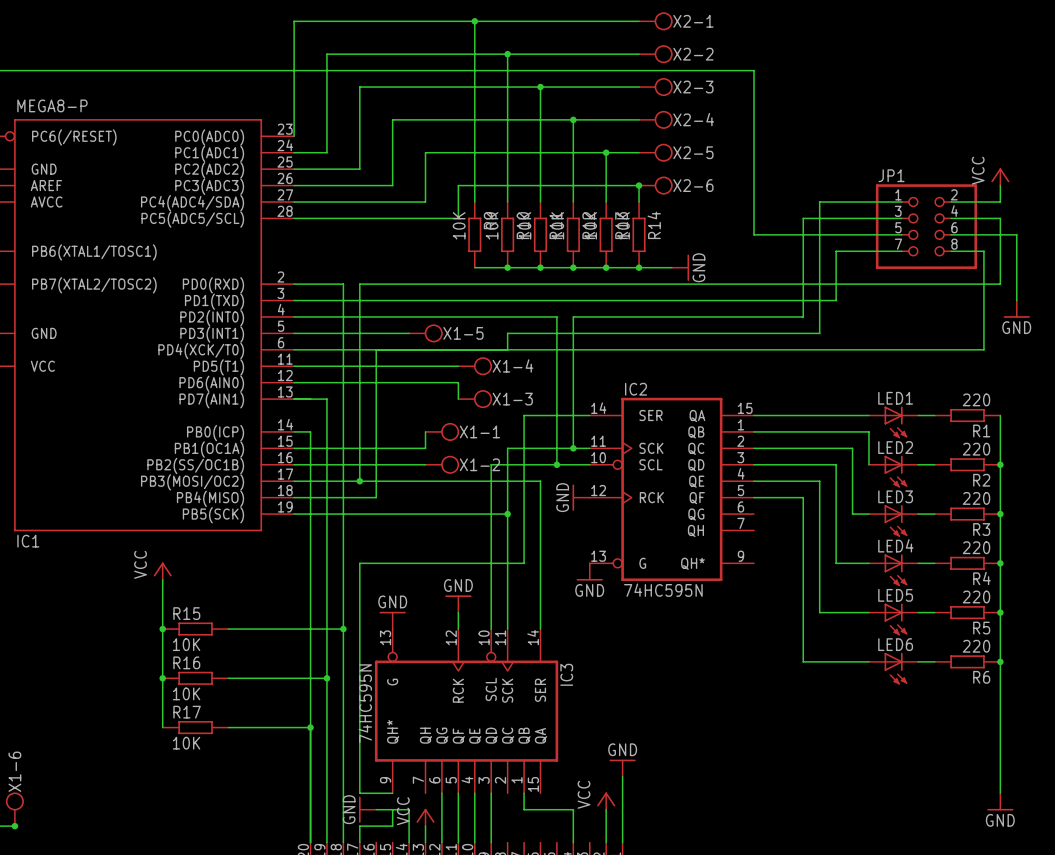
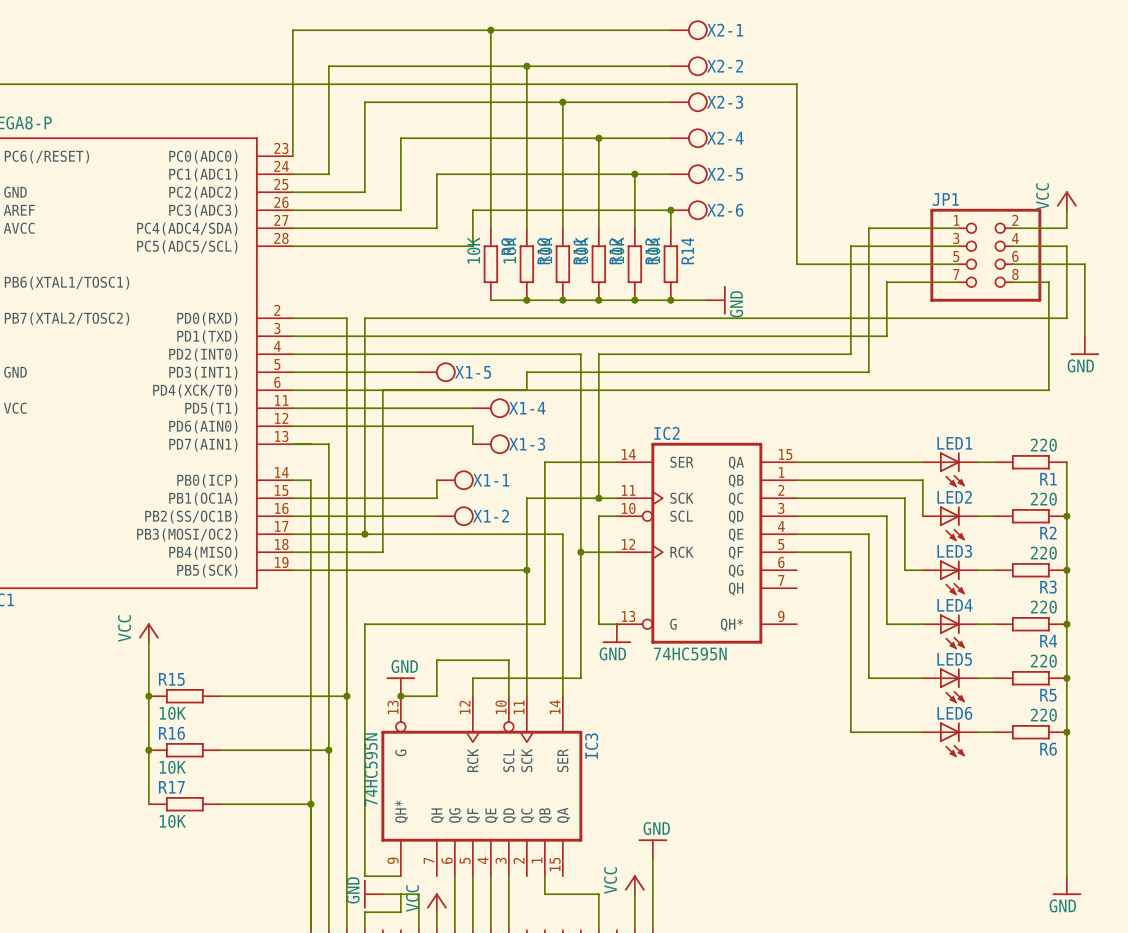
wire: none -> (580, 516) (580, 678) (472, 678)
junction position: (556, 464) -> (580, 552)
wire: (573, 464) (491, 464) (491, 596) -> (598, 516) (598, 624) (616, 624)
power symbol: GND (581, 497) -> none
wire: none -> (508, 660) (436, 660) (436, 696) (400, 696)
power symbol: GND (458, 603) -> none
junction: none -> (400, 696)

